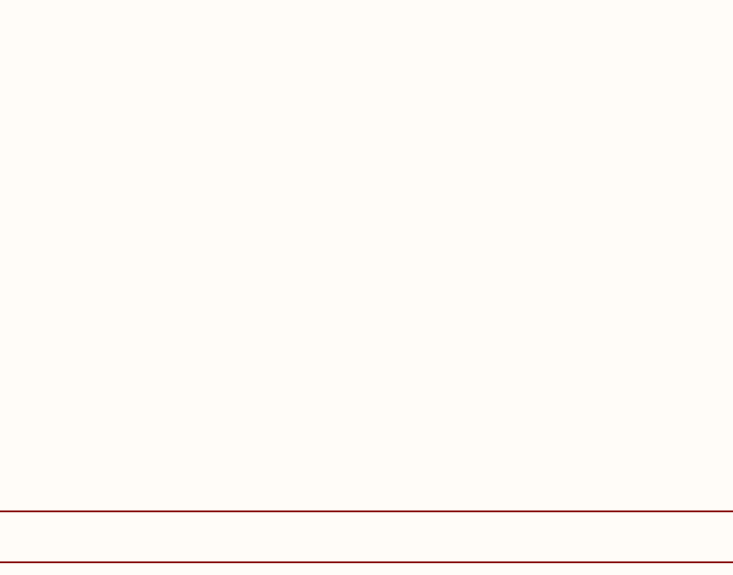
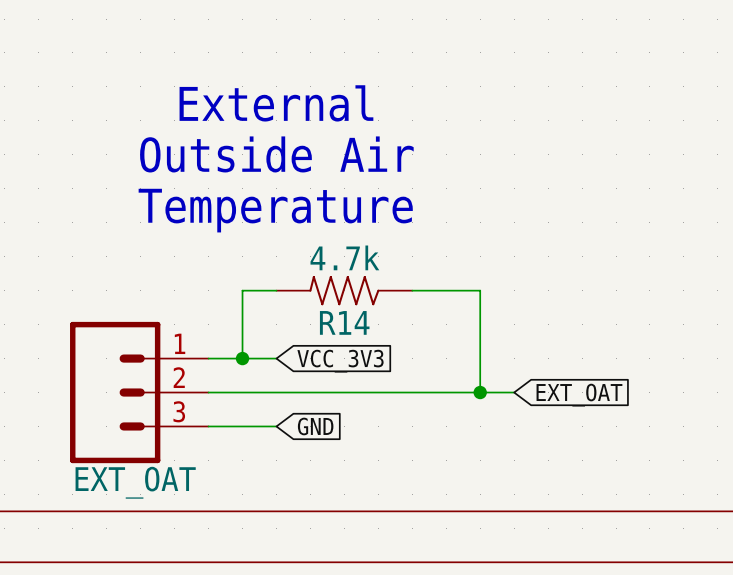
text: none -> External (276, 103)
text: none -> Outside Air (276, 154)
text: none -> Temperature (275, 210)
wire: none -> (276, 290) (242, 290) (242, 358)
R14: none -> 4.7k (344, 290)
wire: none -> (412, 290) (480, 290) (480, 392)
wire: none -> (208, 358) (276, 358)
junction: none -> (242, 358)
global label: none -> VCC_3V3 (340, 361)
EXT_OAT: none -> (139, 392)
wire: none -> (208, 392) (514, 392)
junction: none -> (480, 392)
global label: none -> EXT_OAT (579, 395)
wire: none -> (208, 426) (276, 426)
global label: none -> GND (315, 426)

